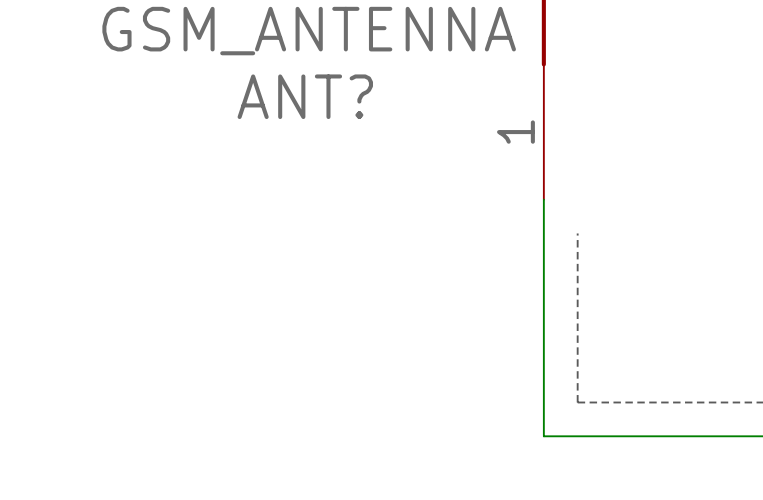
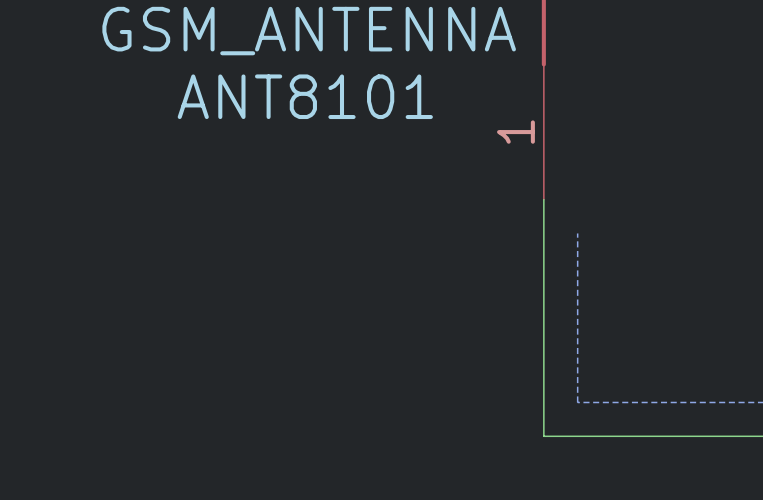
ANT? name: ANT? (305, 96) -> ANT8101 (305, 96)

